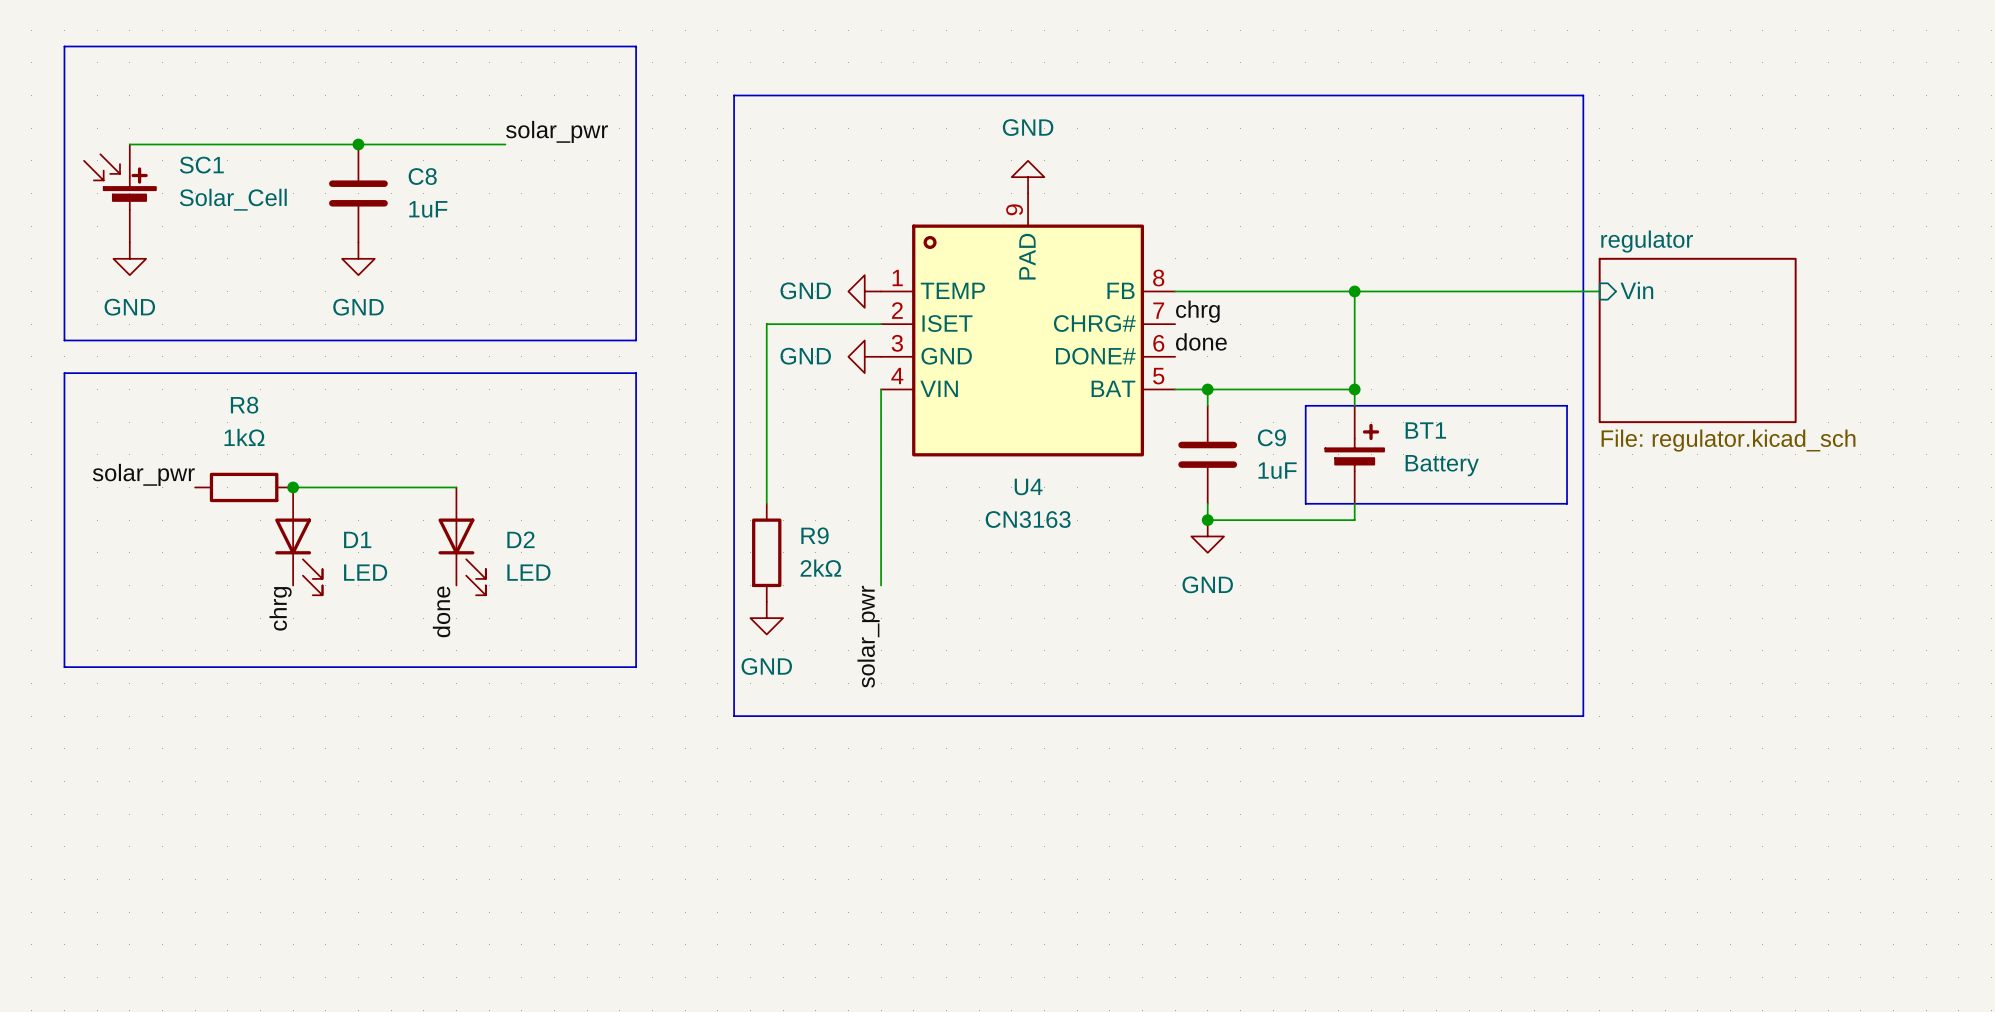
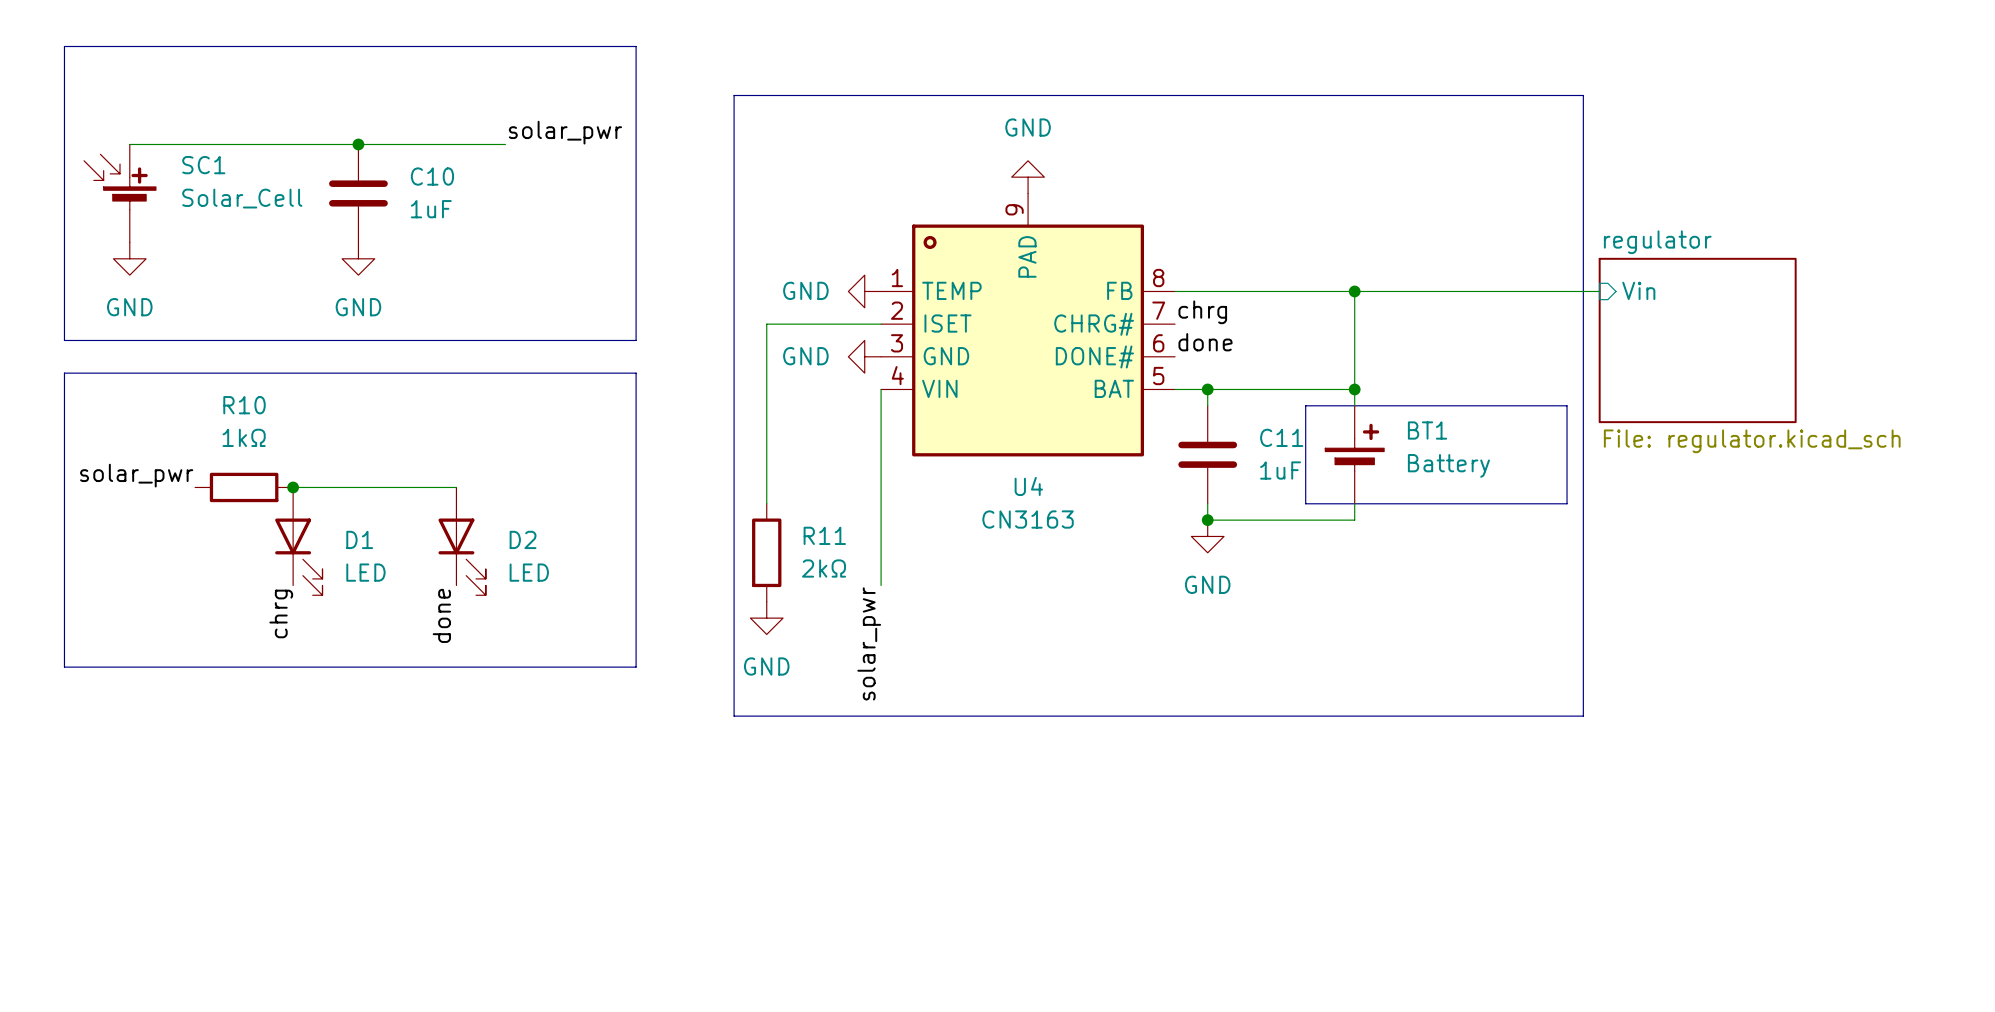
C8 name: C8 (422, 176) -> C10 (432, 176)
R8 name: R8 (244, 405) -> R10 (244, 405)
C9 name: C9 (1271, 437) -> C11 (1281, 437)
R9 name: R9 (814, 535) -> R11 (824, 535)

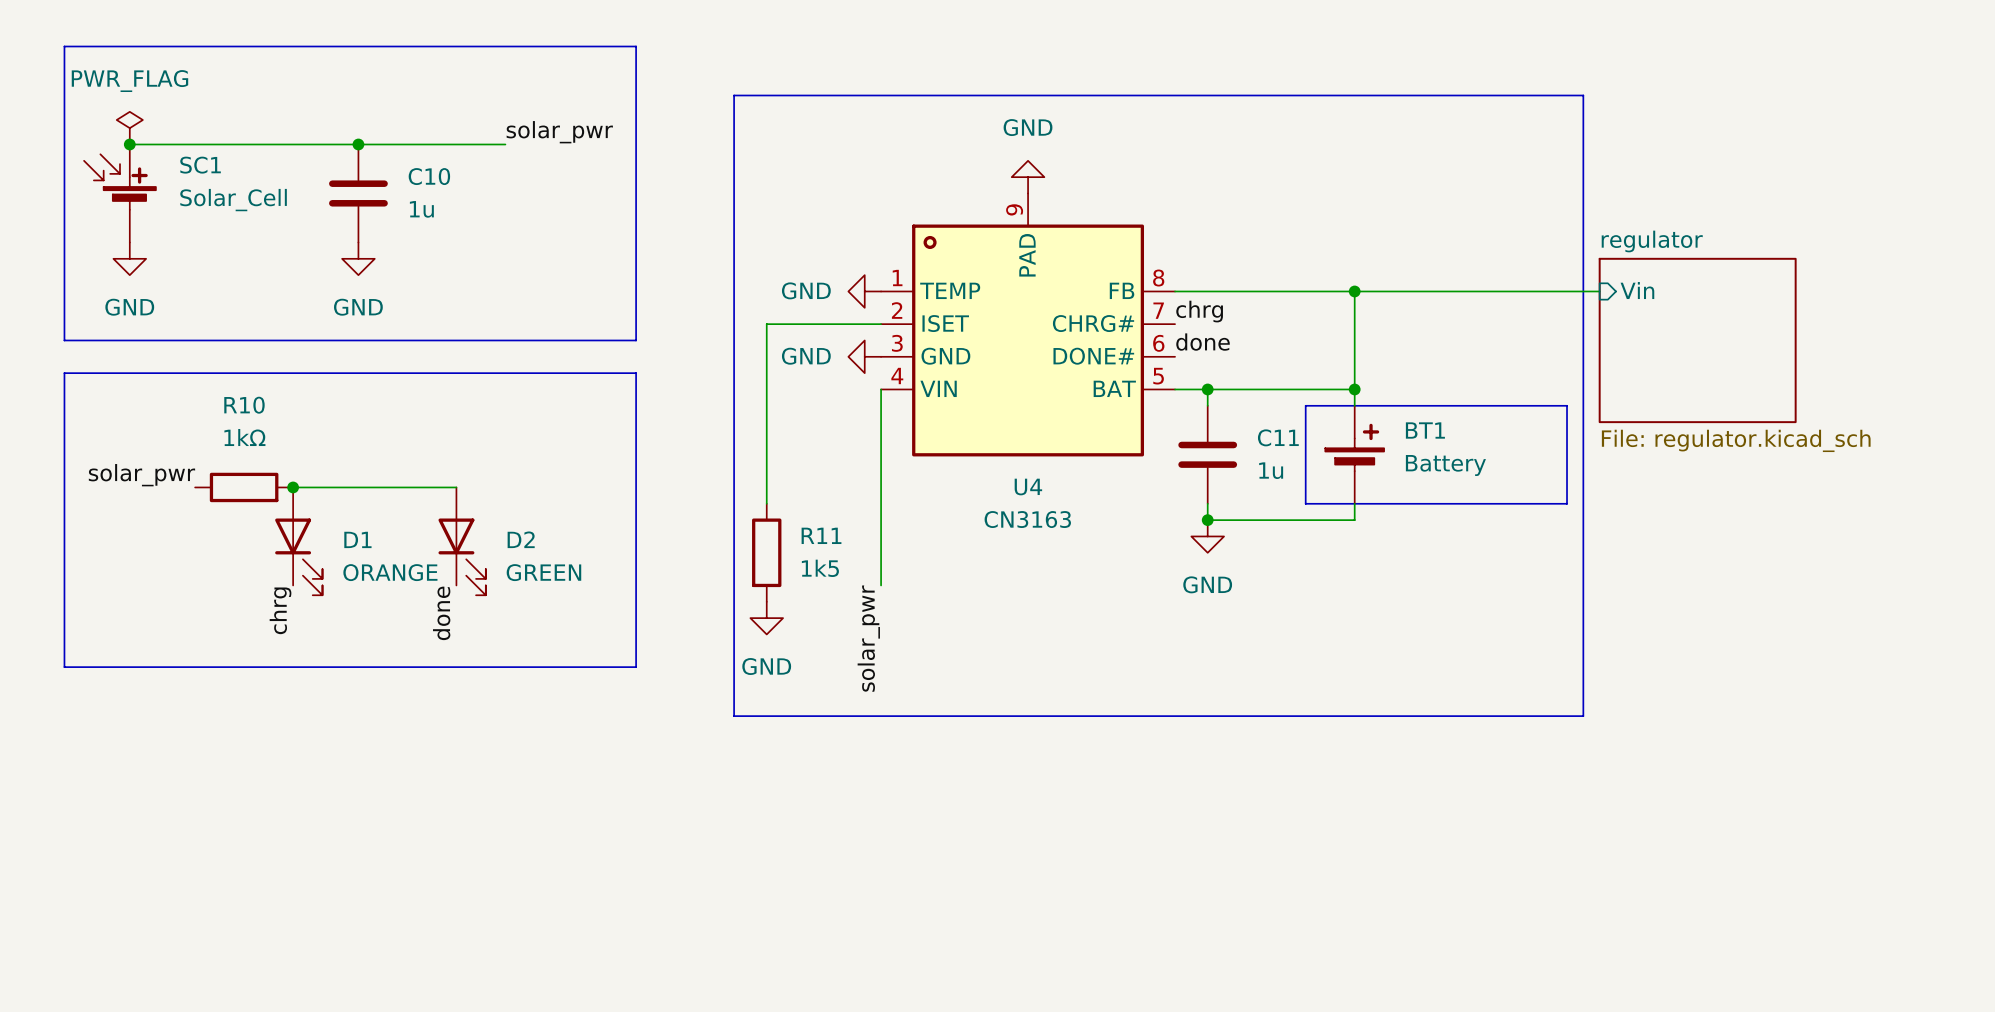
power symbol: none -> PWR_FLAG (129, 128)
junction: none -> (129, 144)
C10 value: 1uF (431, 209) -> 1u (421, 209)
C11 value: 1uF (1280, 470) -> 1u (1271, 470)
R11 value: 2kΩ (824, 568) -> 1k5 (820, 568)
D1 value: LED (365, 572) -> ORANGE (390, 572)
D2 value: LED (529, 572) -> GREEN (543, 572)

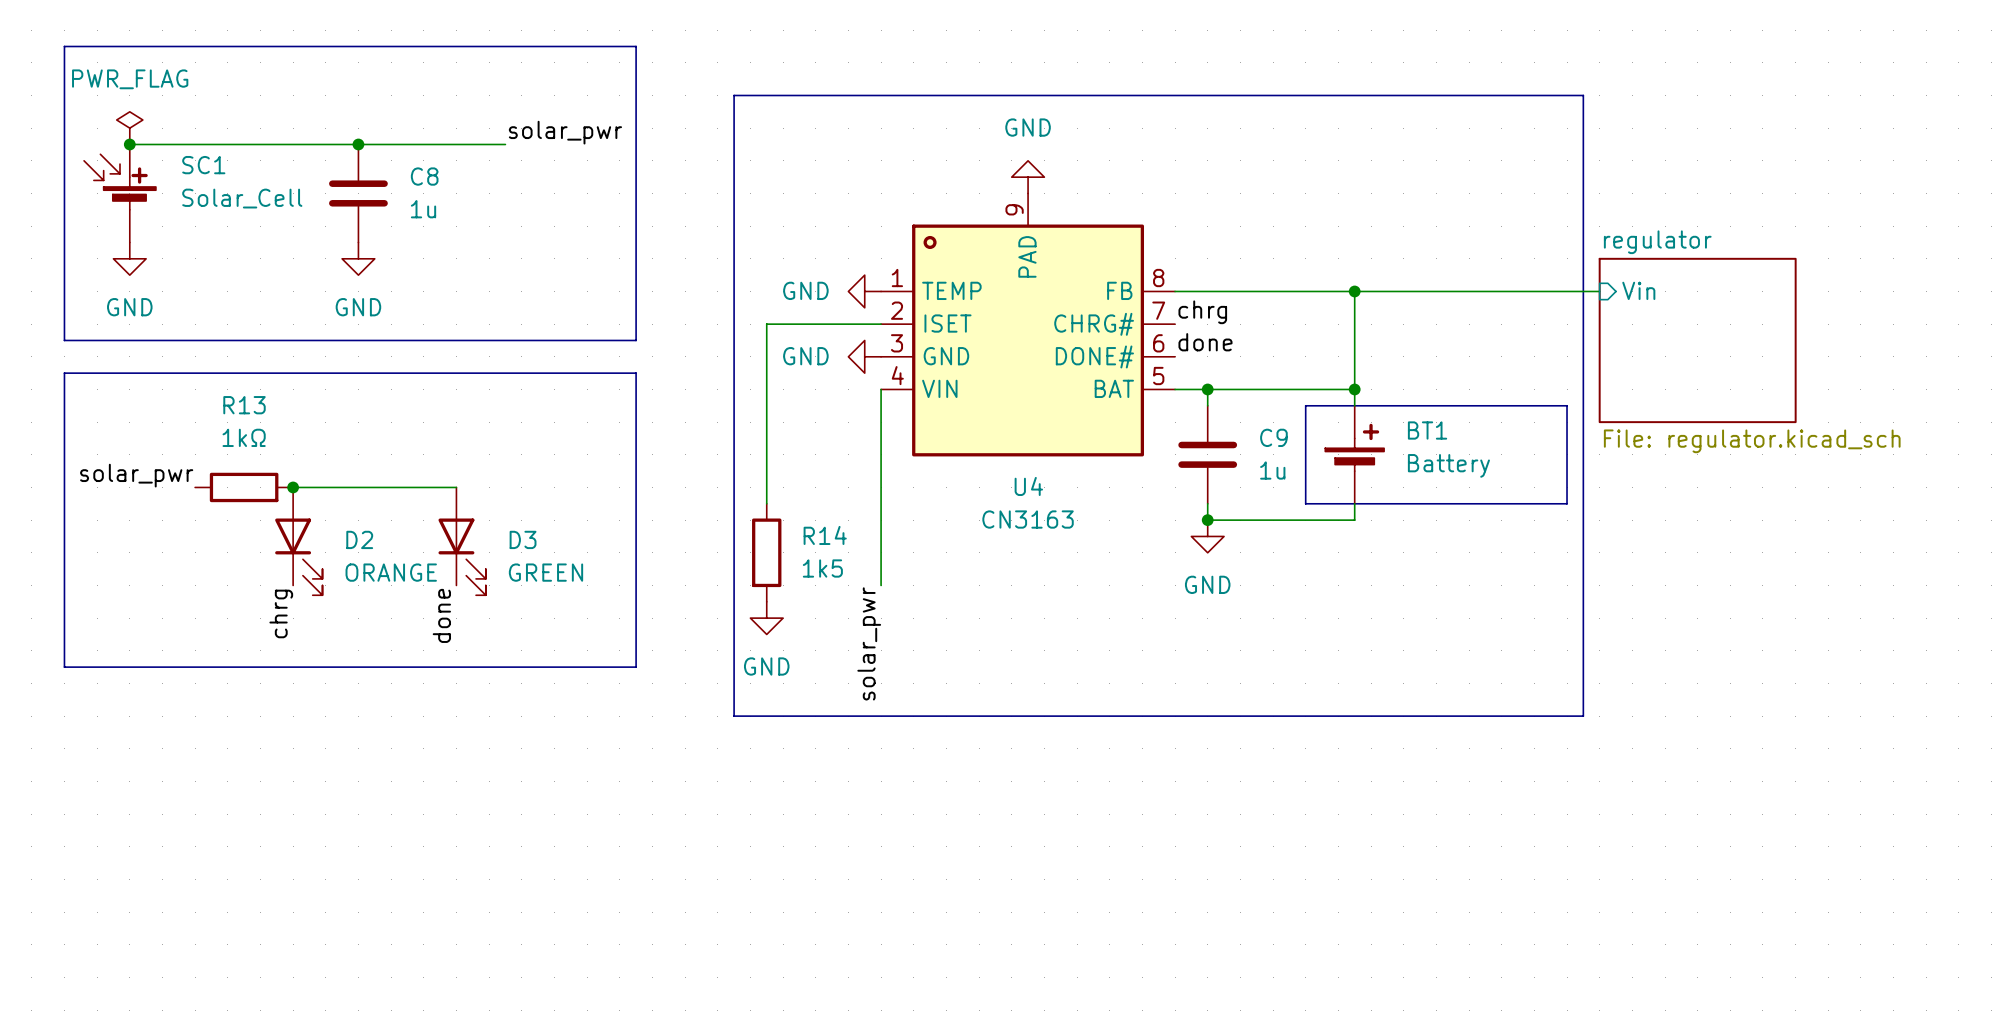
C10 name: C10 (429, 176) -> C8 (424, 176)
R10 name: R10 (244, 405) -> R13 (244, 405)
C11 name: C11 (1278, 437) -> C9 (1273, 437)
R11 name: R11 (821, 535) -> R14 (825, 535)
D1 name: D1 (357, 539) -> D2 (359, 539)
D2 name: D2 (521, 539) -> D3 (523, 539)

